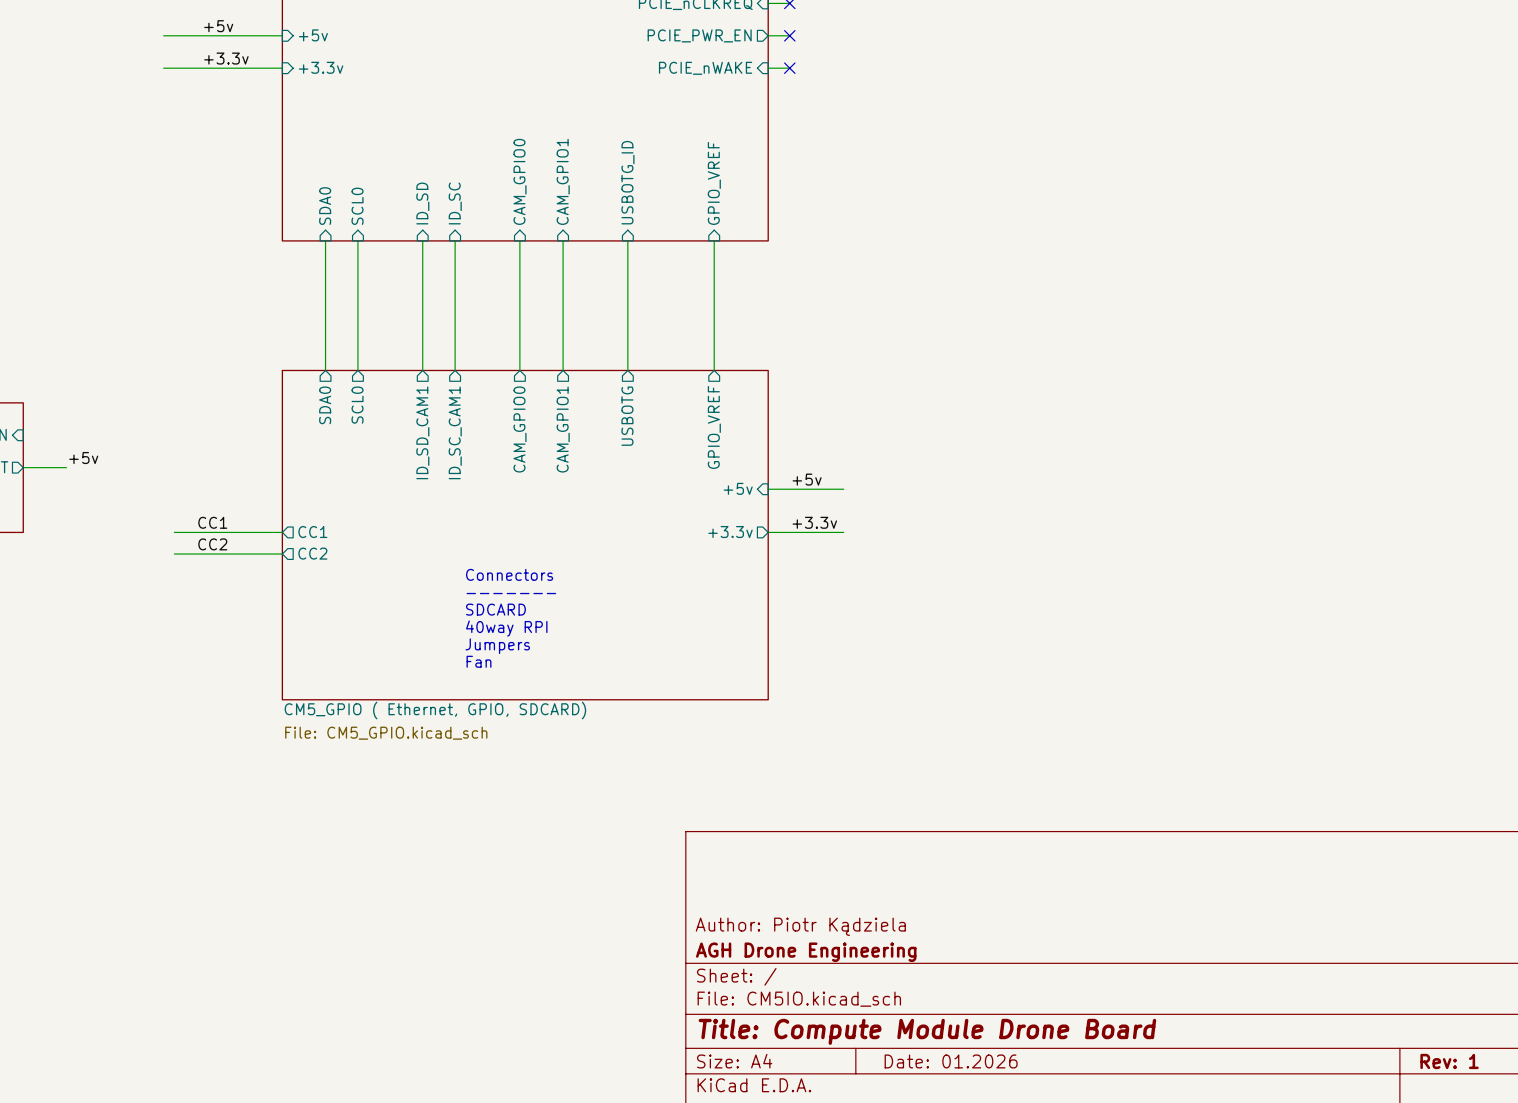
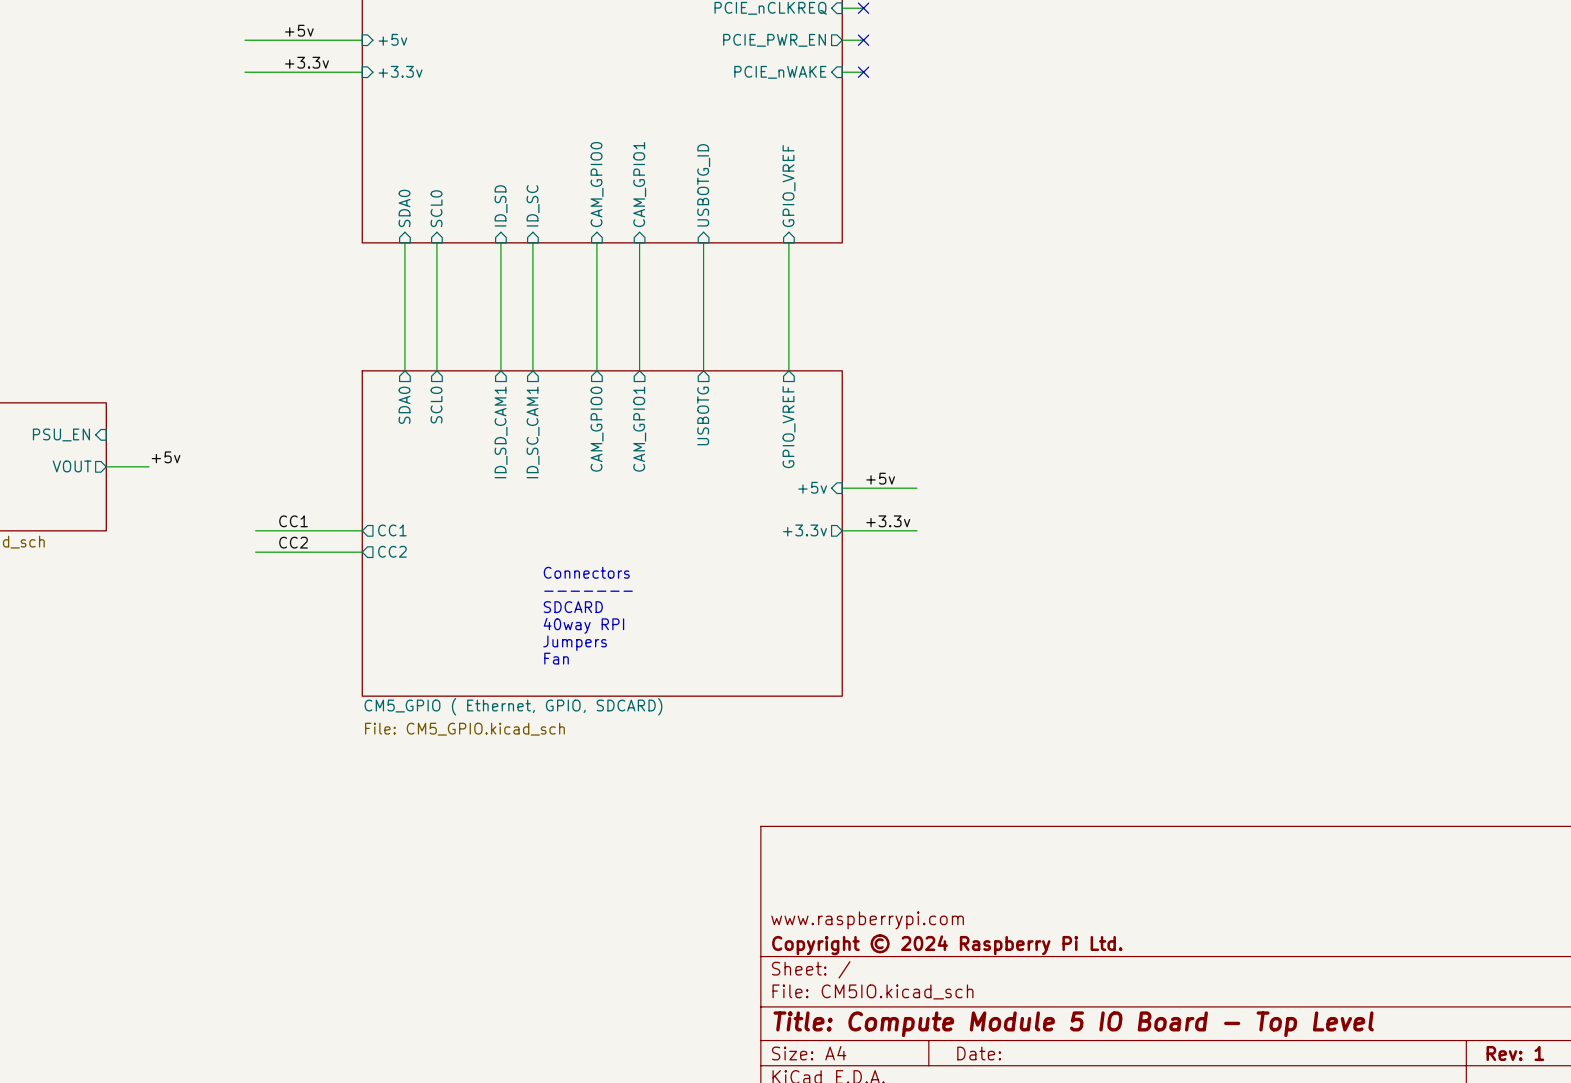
title block: Author: Piotr Kądziela (800, 926) -> www.raspberrypi.com (867, 920)
title block: AGH Drone Engineering (806, 952) -> Copyright © 2024 Raspberry Pi Ltd. (947, 944)
title block: Title: Compute Module Drone Board (927, 1031) -> Title: Compute Module 5 IO Board - Top Level (1073, 1024)
title block: Date: 01.2026 (951, 1061) -> Date: (979, 1053)

